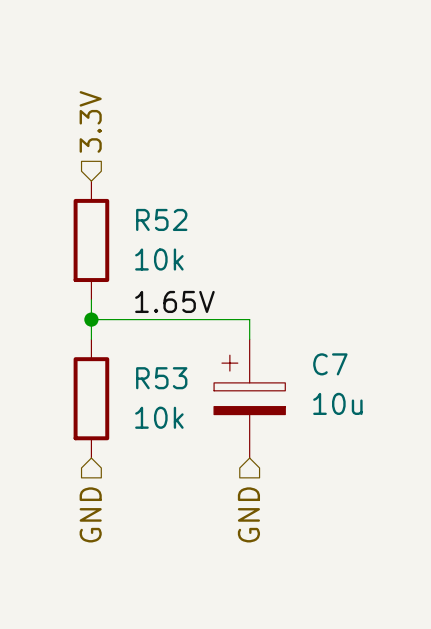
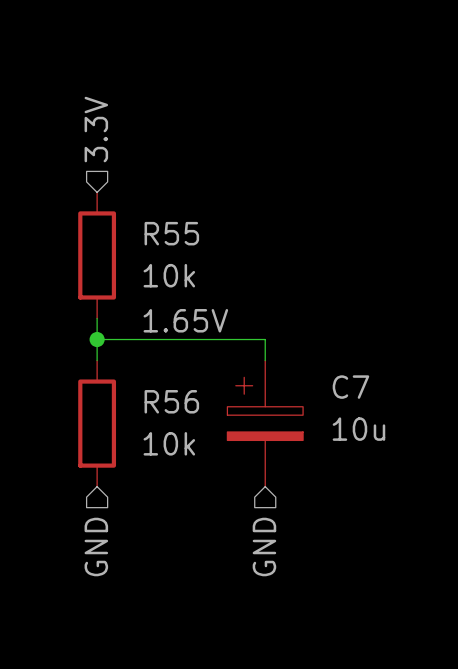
R52 name: R52 (161, 219) -> R55 (171, 233)
R53 name: R53 (161, 378) -> R56 (171, 401)

